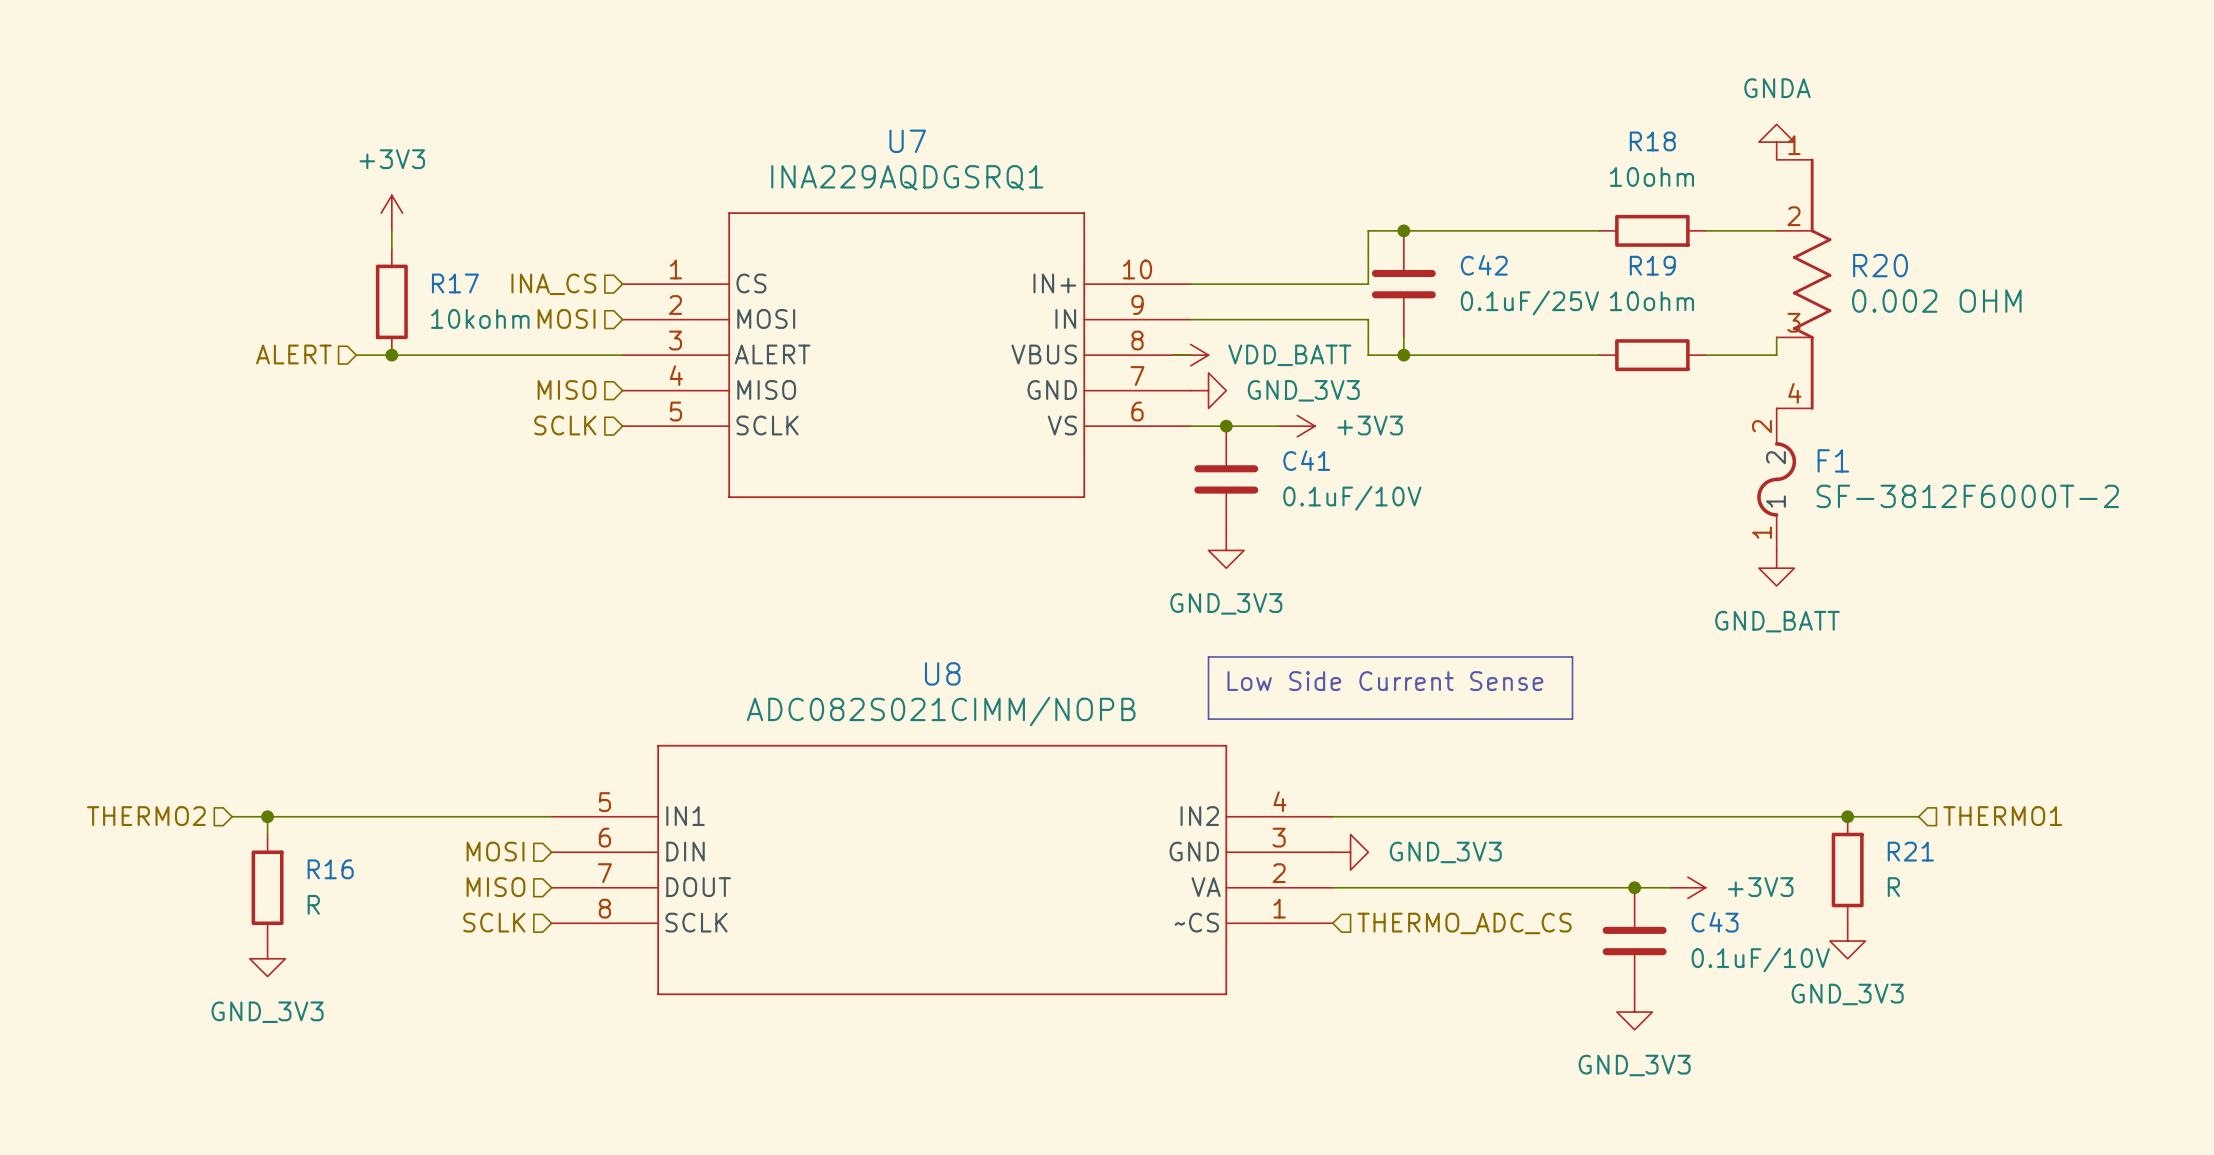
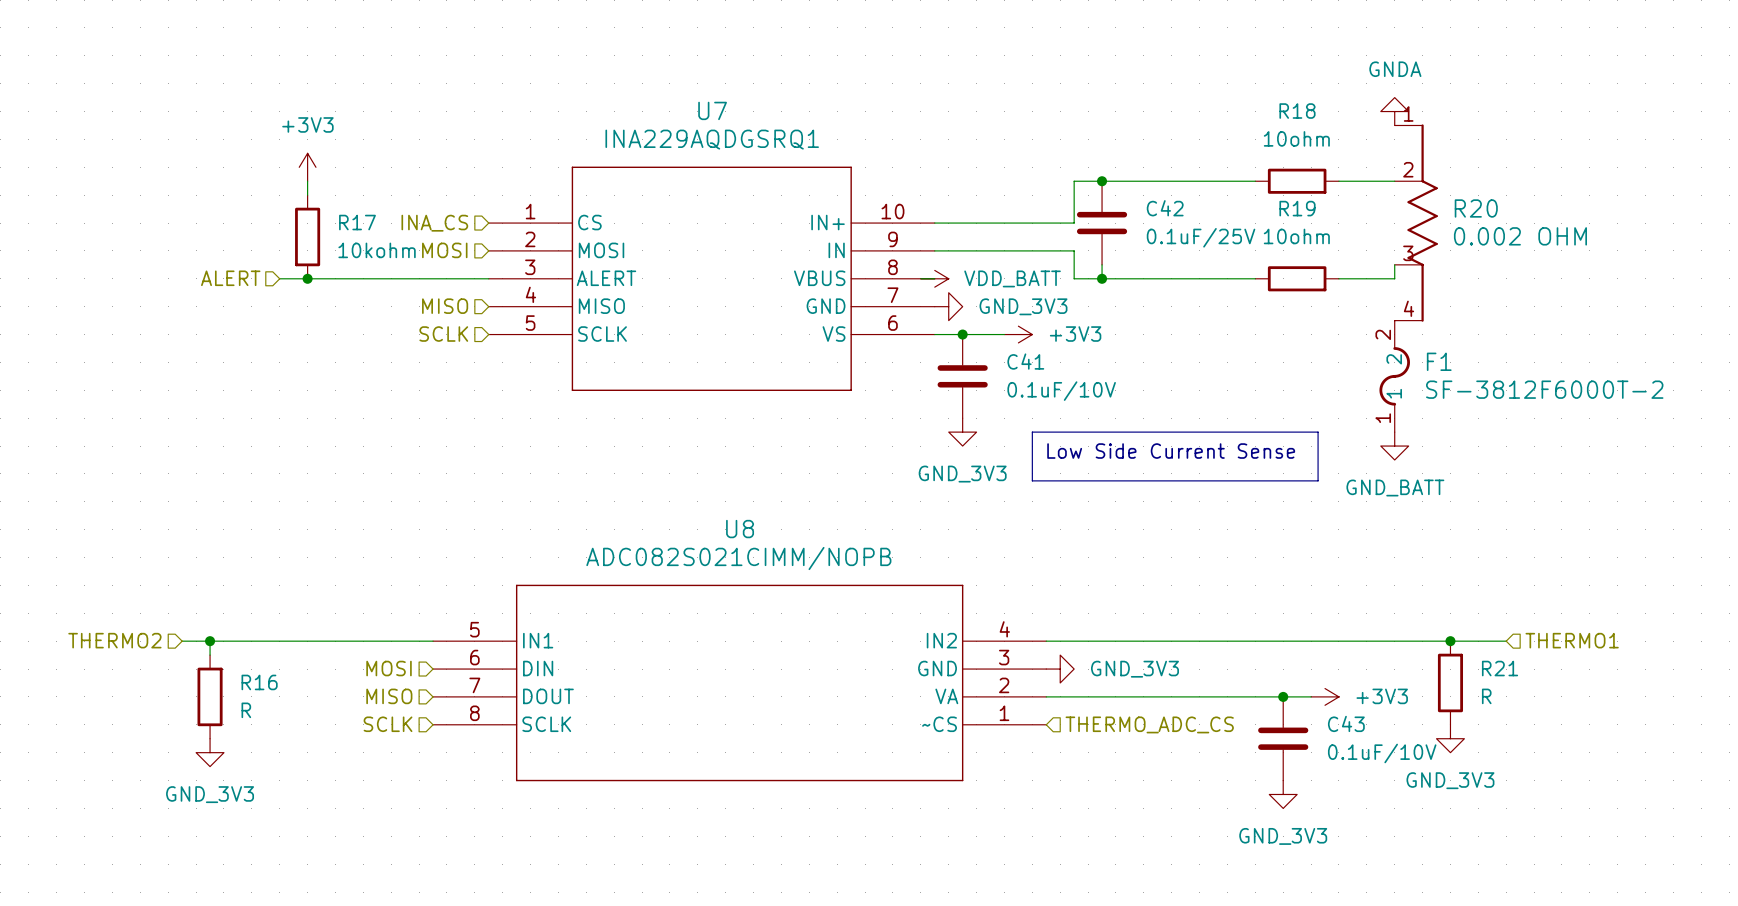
line: (1208, 656) (1572, 656) (1572, 719) (1208, 719) (1208, 656) -> (1032, 432) (1318, 432) (1318, 480) (1032, 480) (1032, 432)
text position: Low Side Current Sense (1385, 681) -> Low Side Current Sense (1171, 451)

